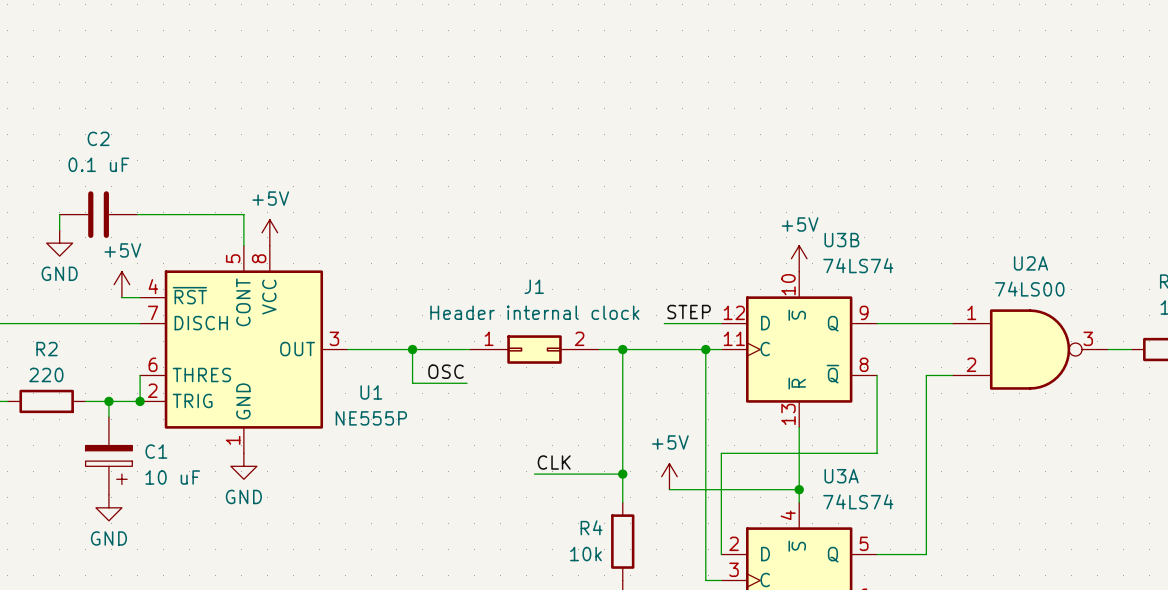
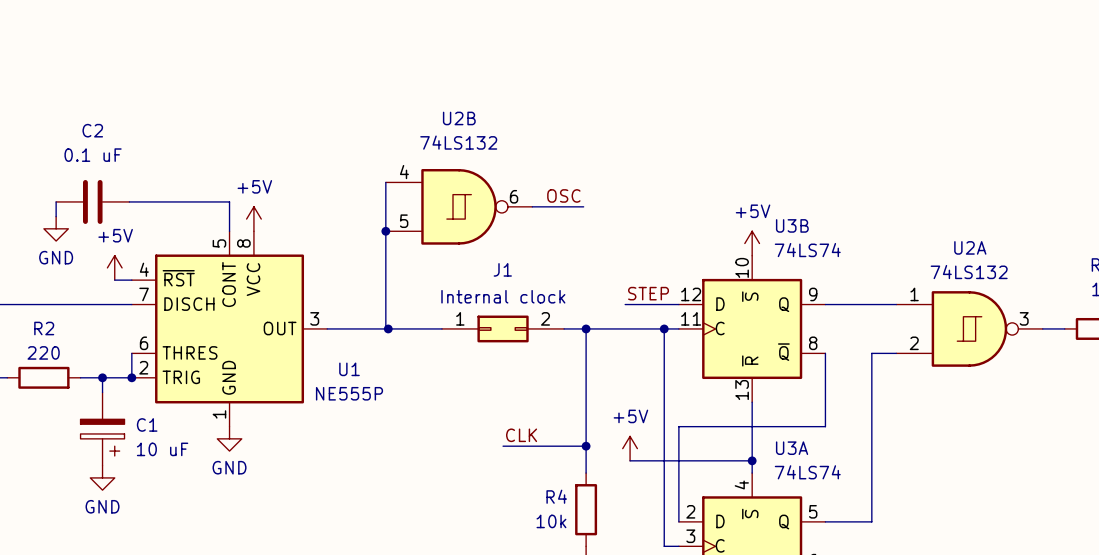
wire: none -> (385, 182) (385, 328)
U2B: none -> 74LS132 (459, 206)
wire: none -> (532, 206) (583, 206)
junction: none -> (385, 231)
U2A value: 74LS00 (1029, 289) -> 74LS132 (969, 272)
U2A symbol: [952, 309, 1109, 390] -> [896, 291, 1043, 367]
J1 value: Header internal clock (534, 312) -> Internal clock (503, 296)
wire: (412, 349) (412, 383) (467, 383) -> none
label position: OSC (446, 371) -> OSC (563, 195)

